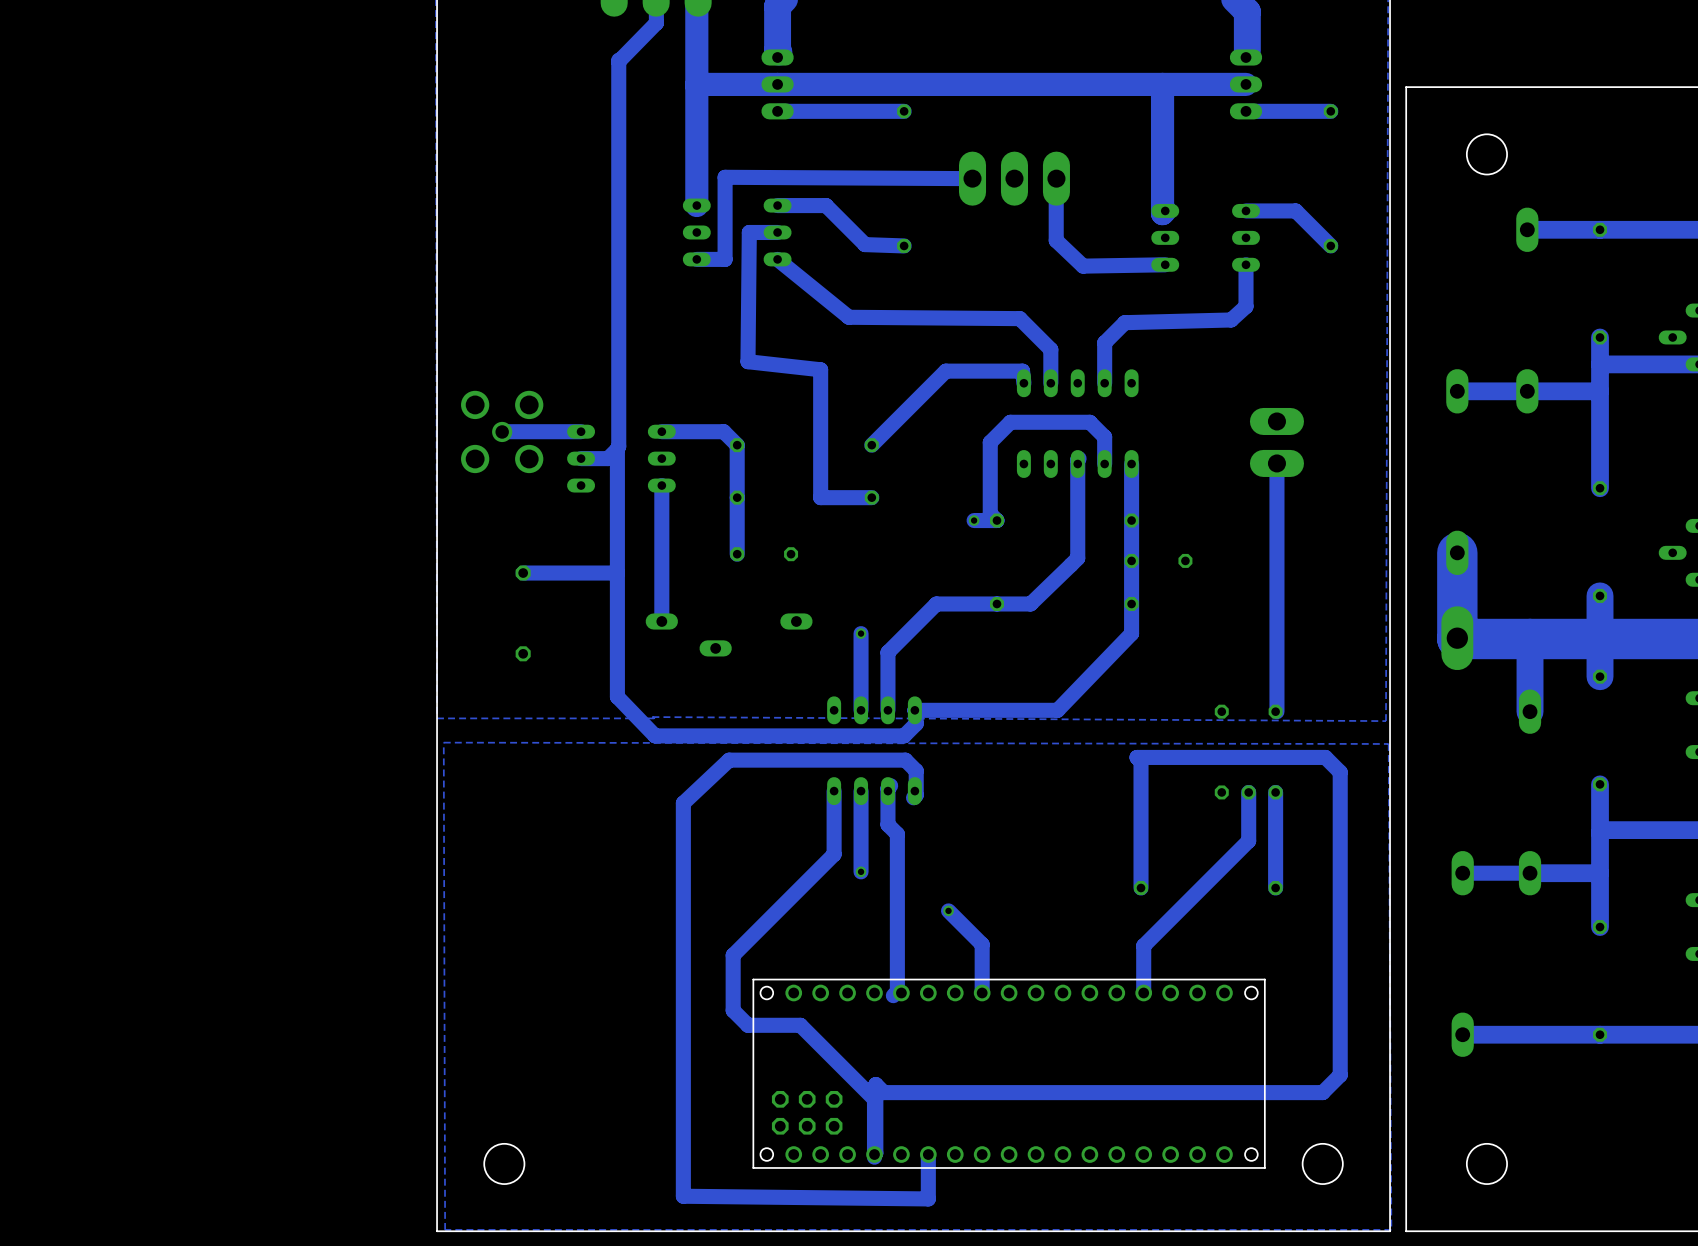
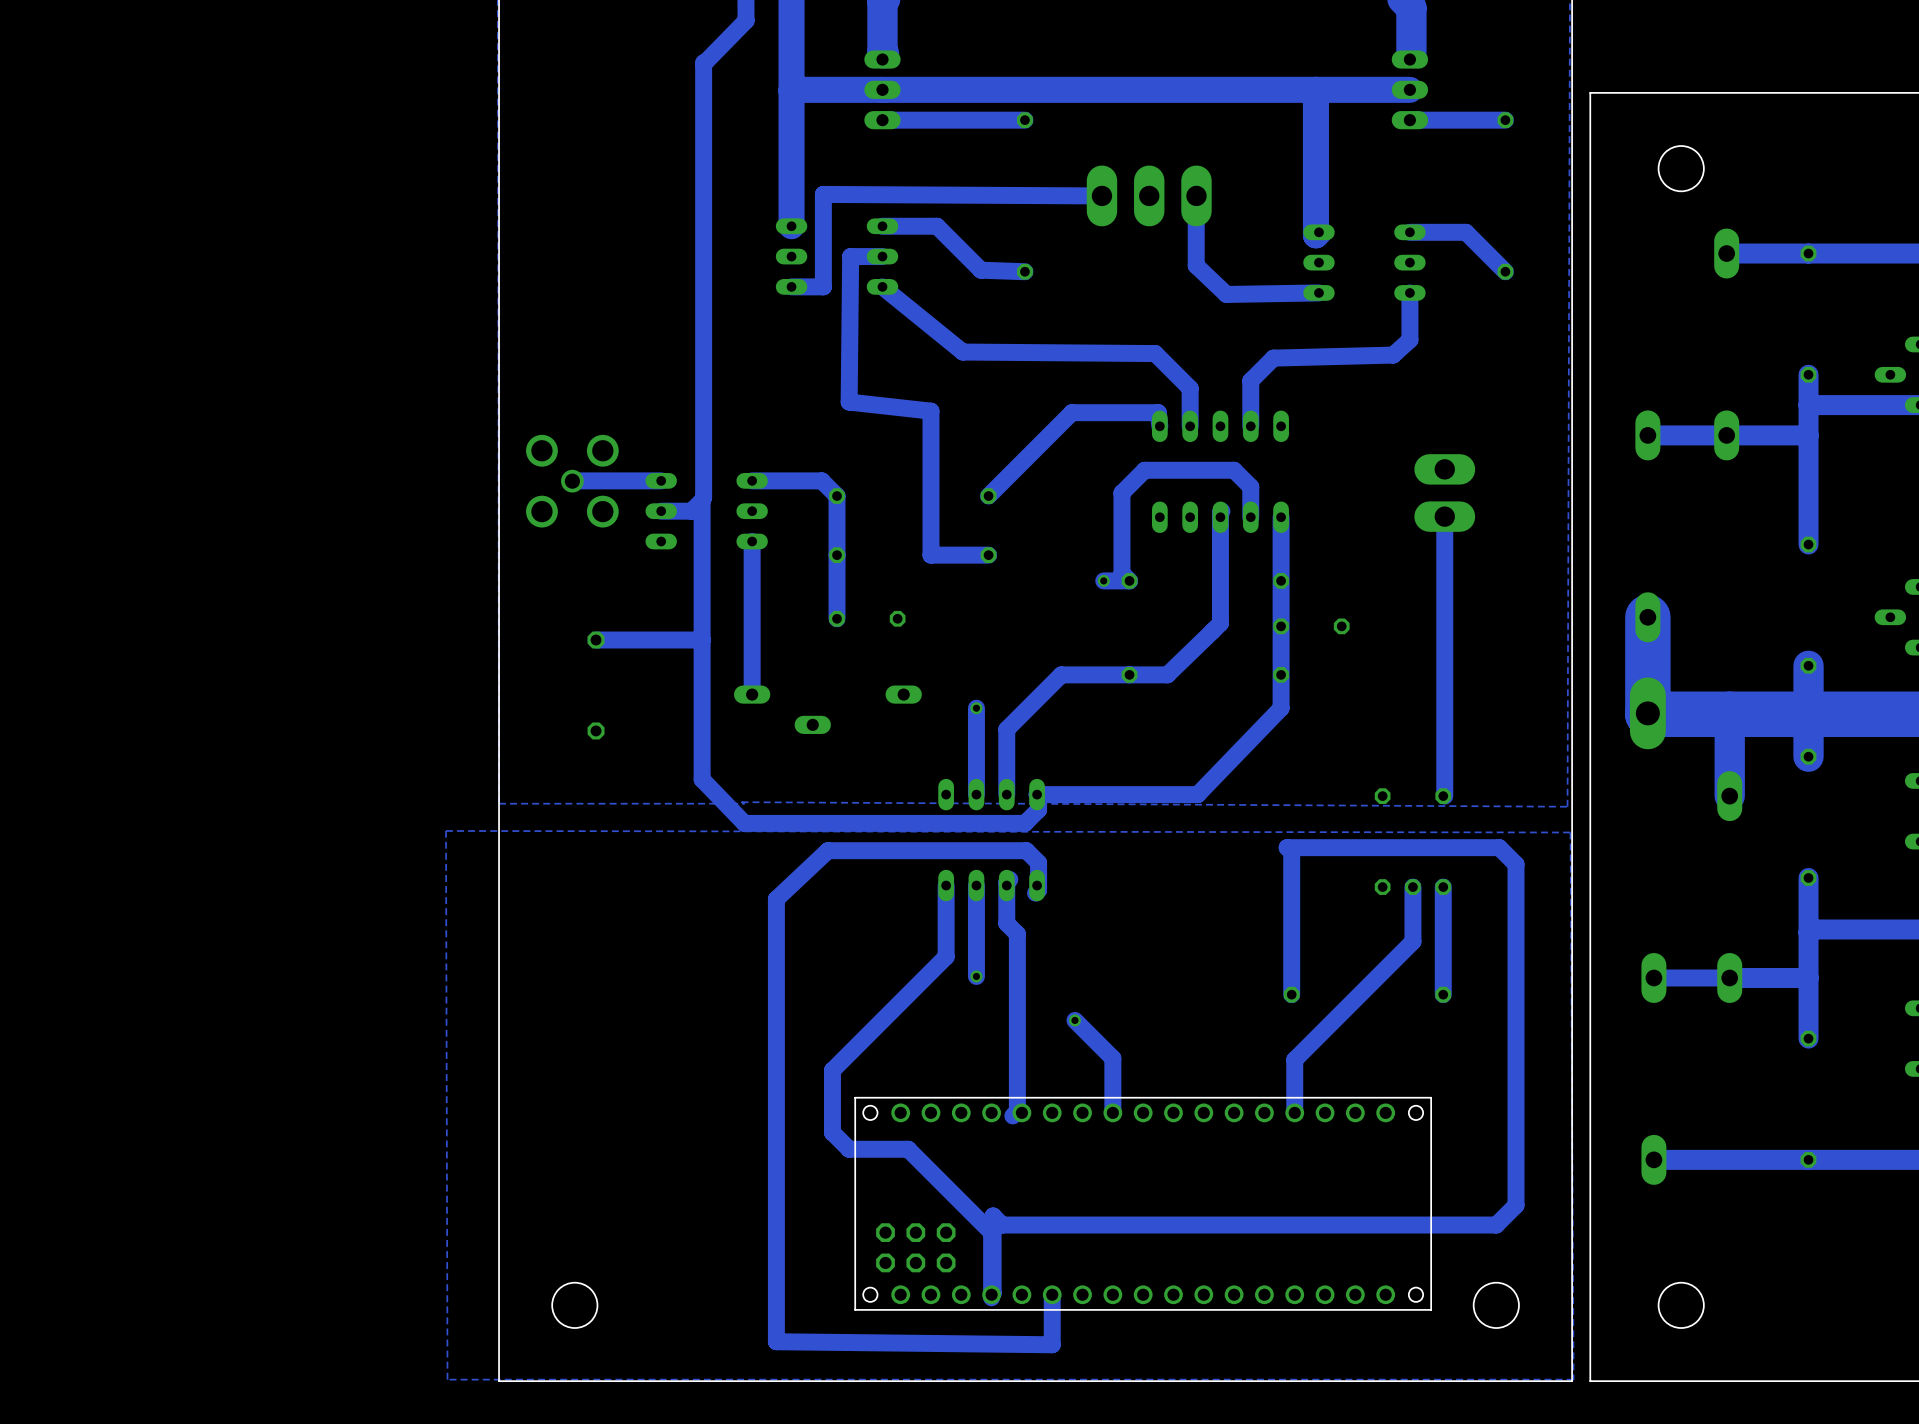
zone outline: (1388, 743) (443, 742) (445, 1229) -> (1570, 832) (445, 830) (447, 1379) (508, 1379)

